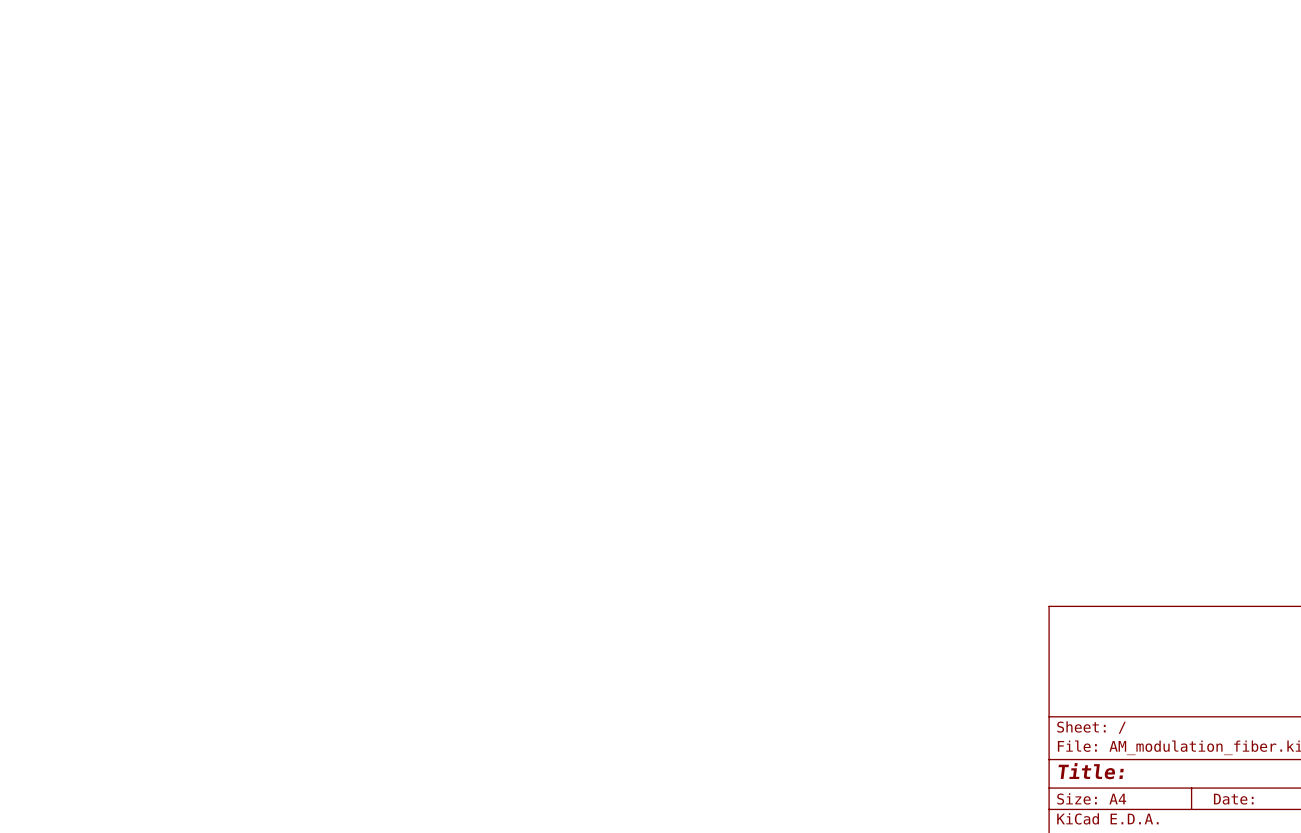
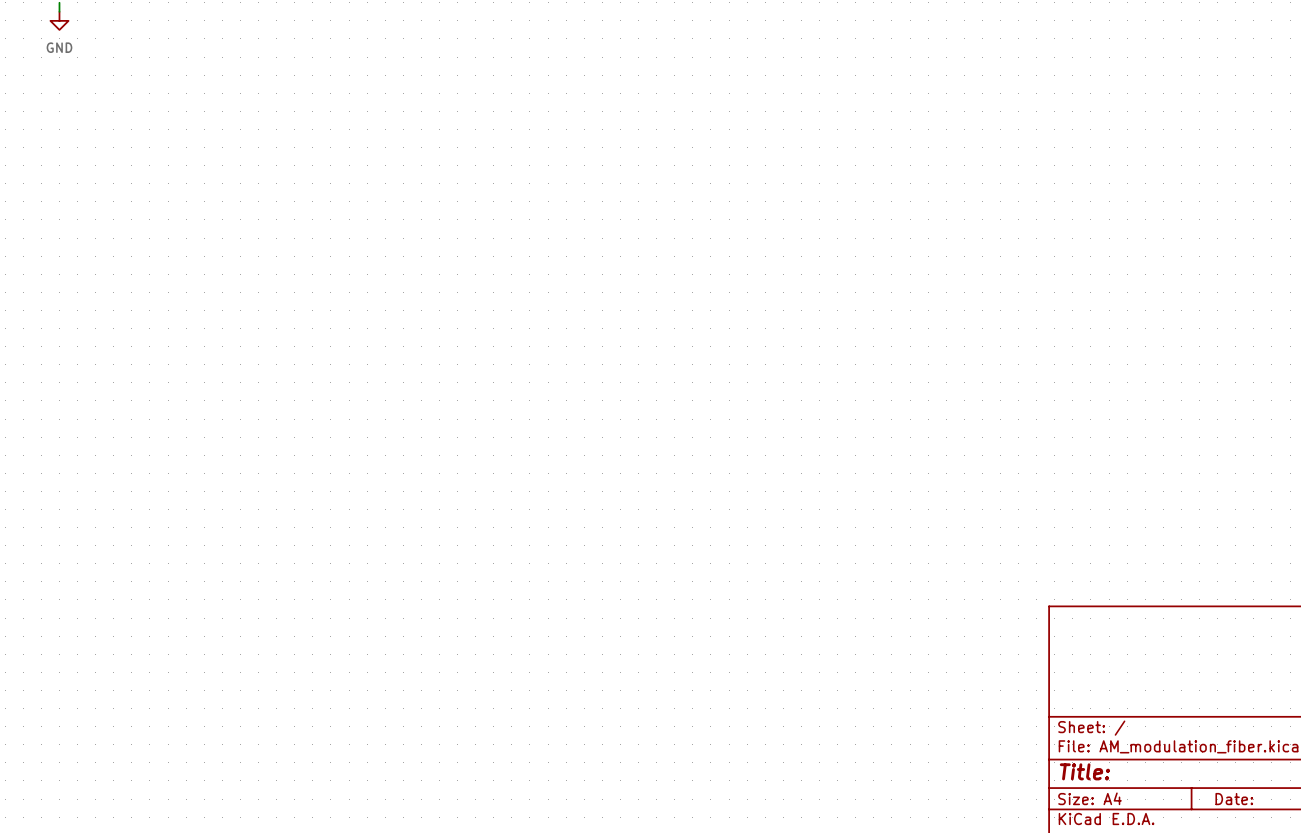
wire: none -> (59, 2) (59, 11)
power symbol: none -> GND (59, 20)

